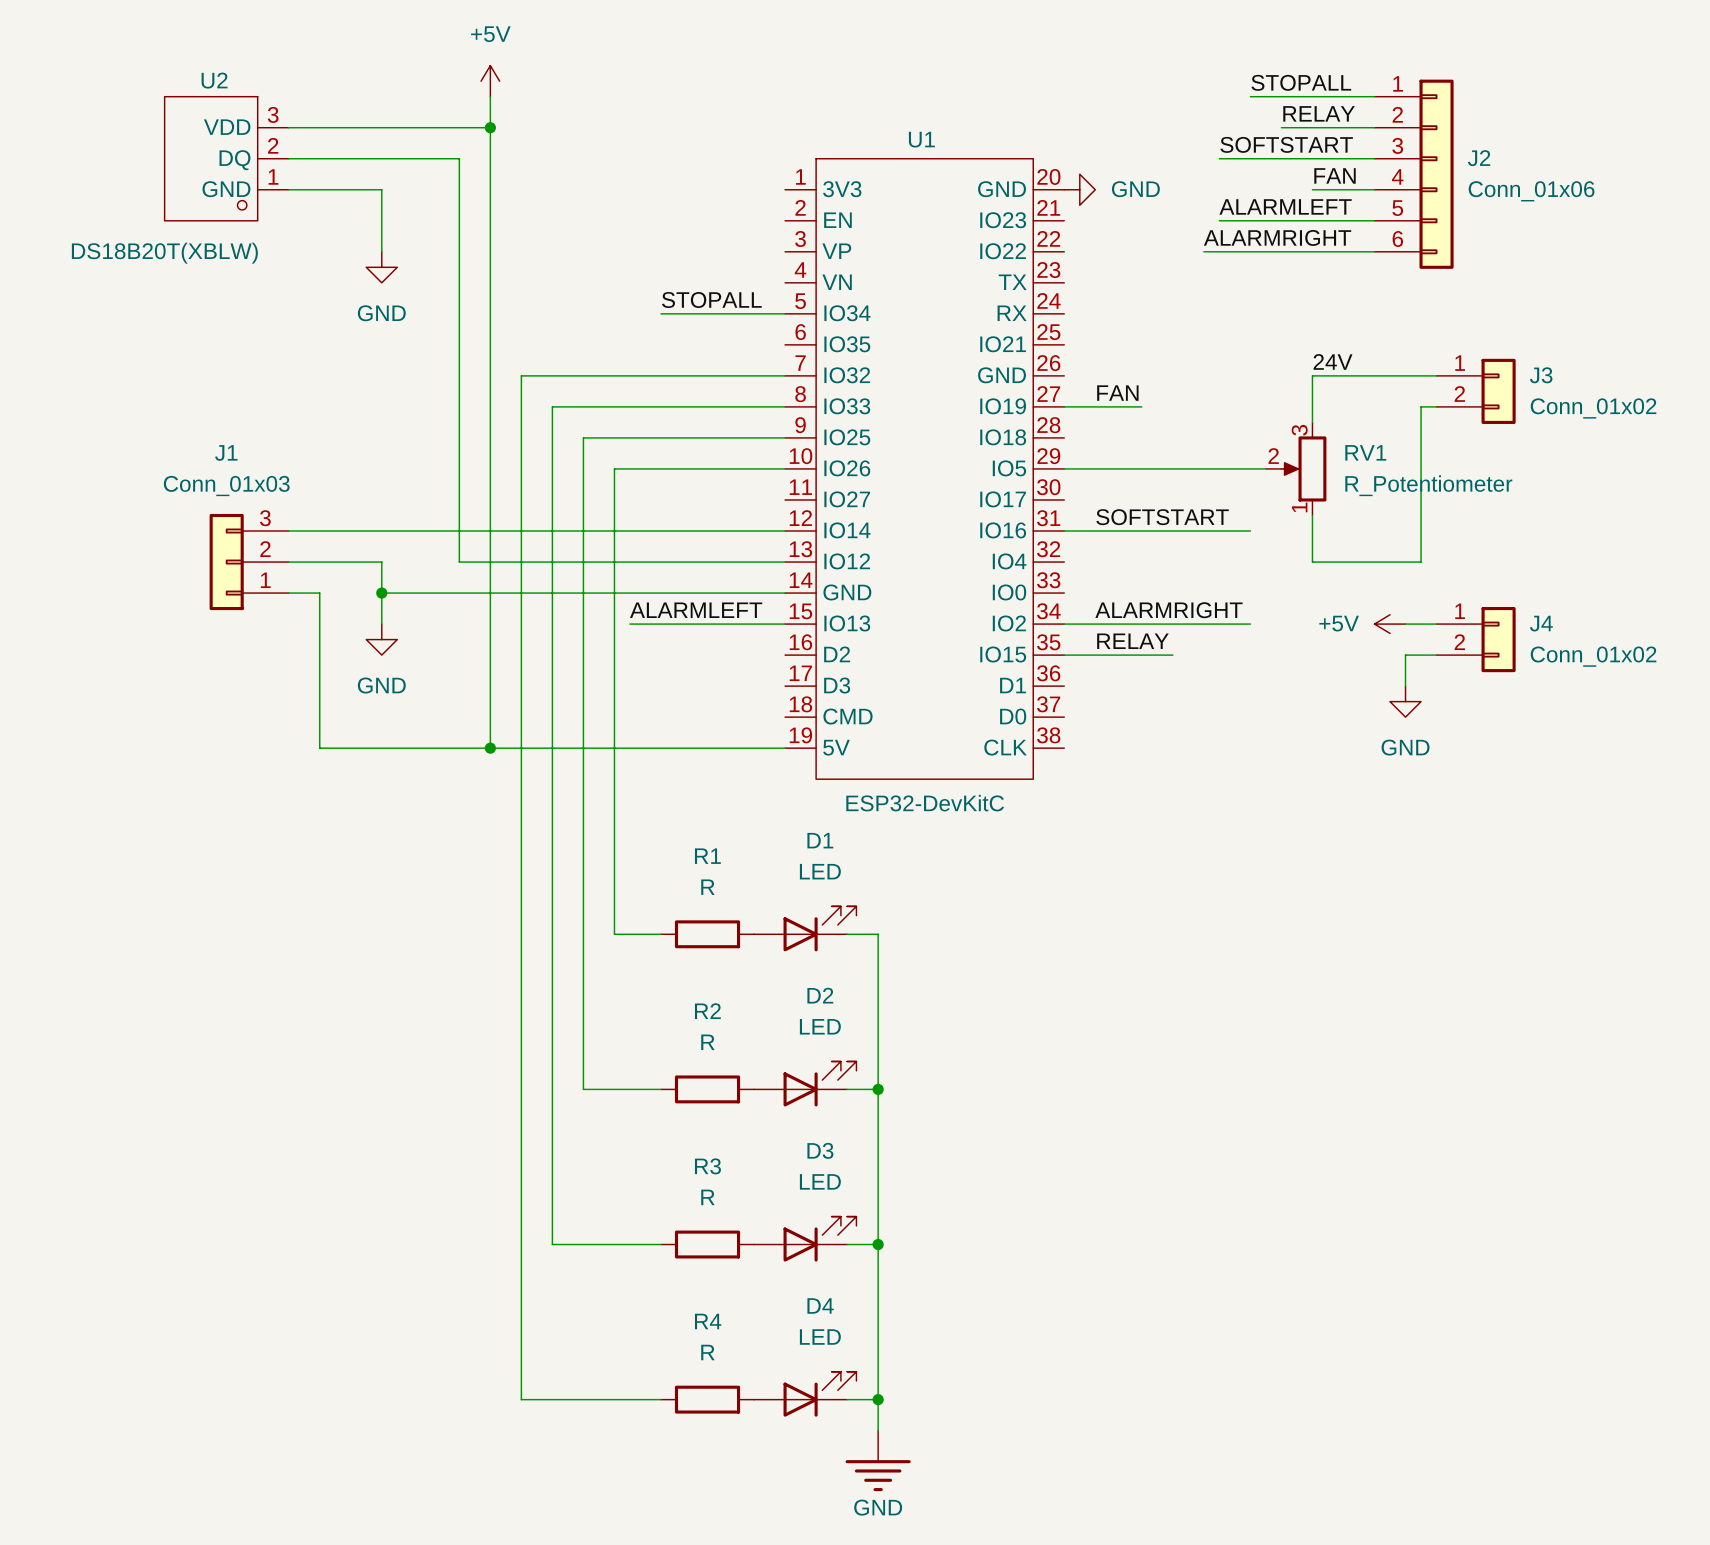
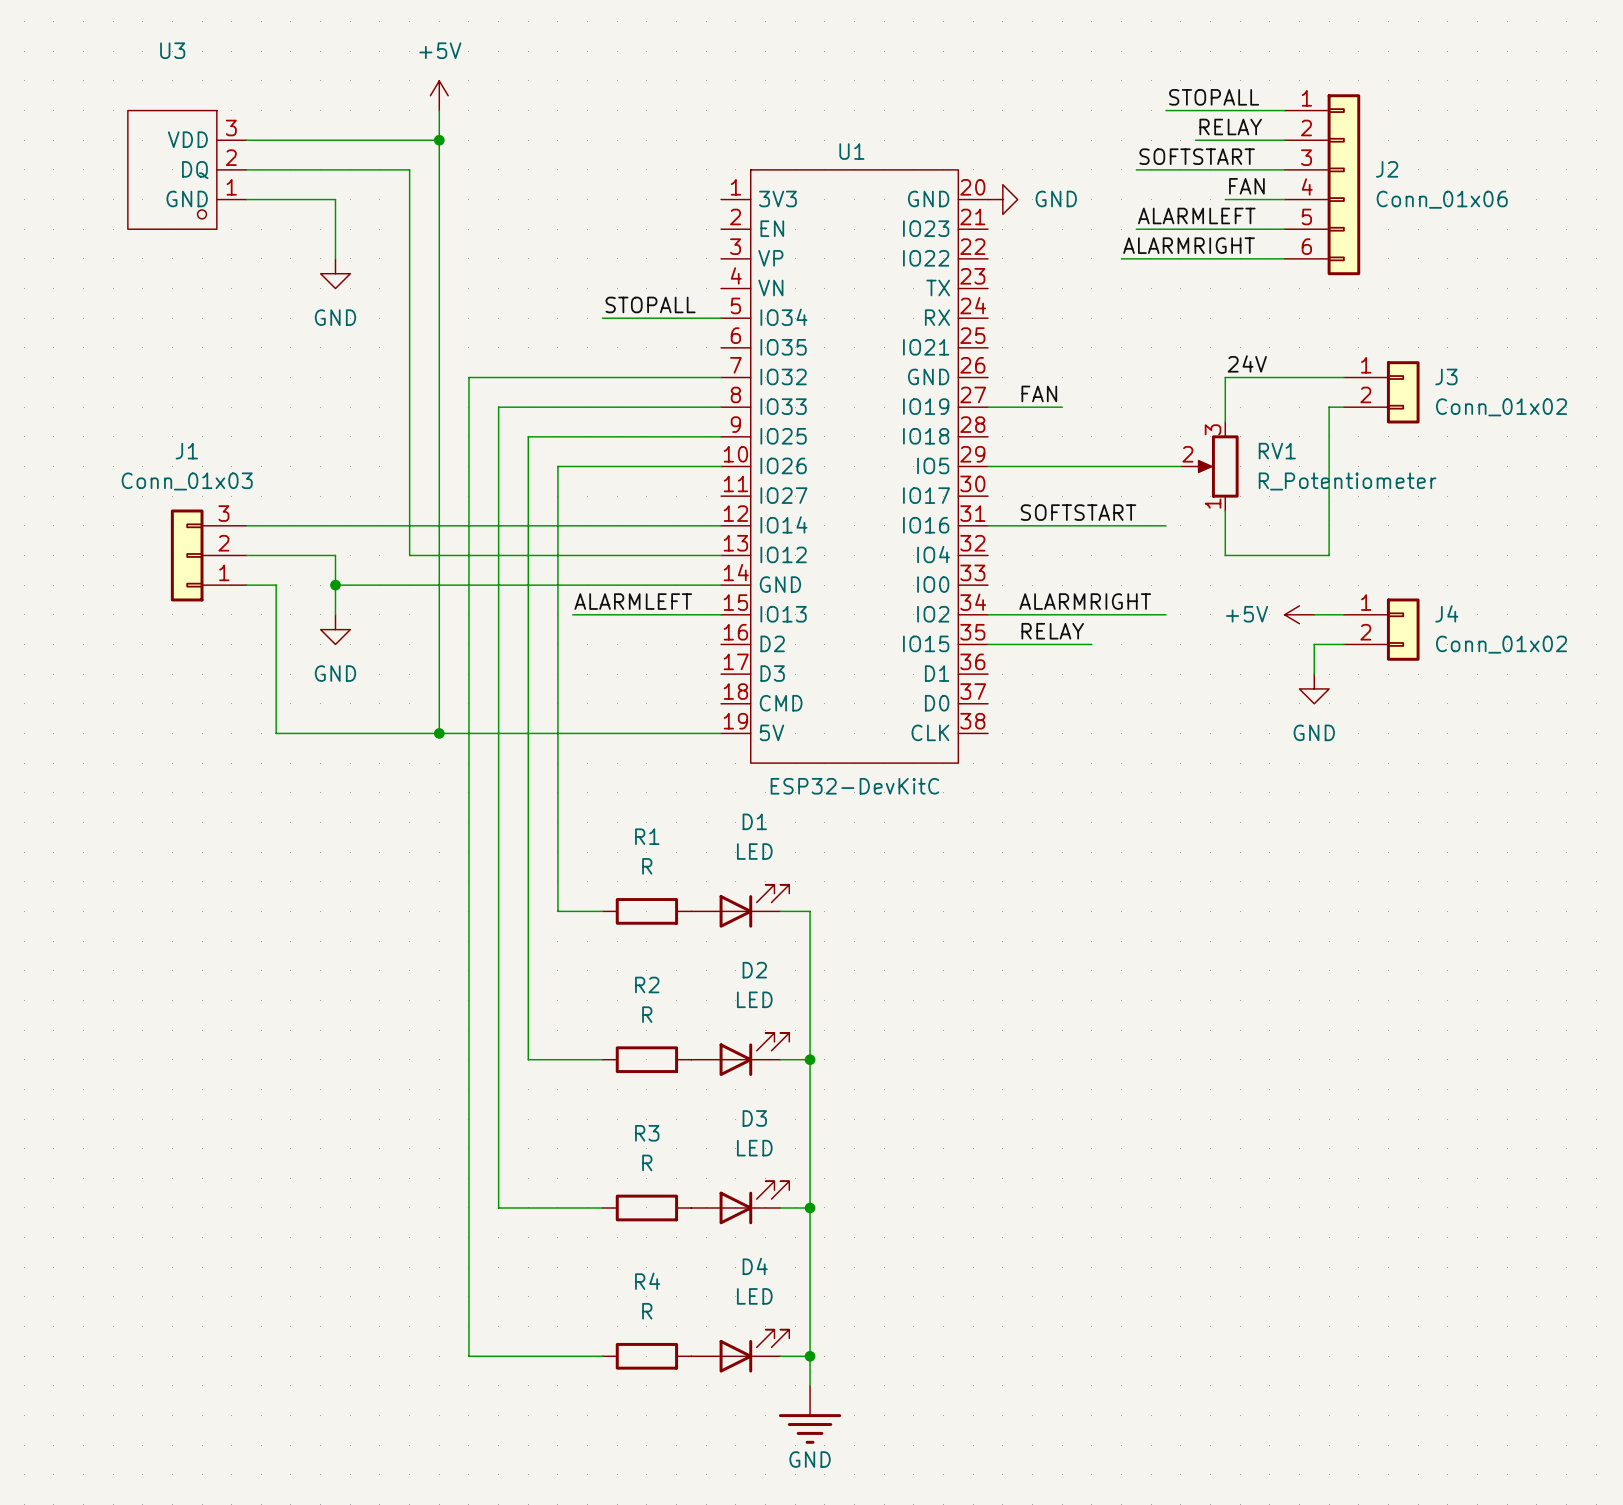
U2 name: U2 (214, 80) -> U3 (172, 50)
U2 value: DS18B20T(XBLW) (164, 253) -> none

